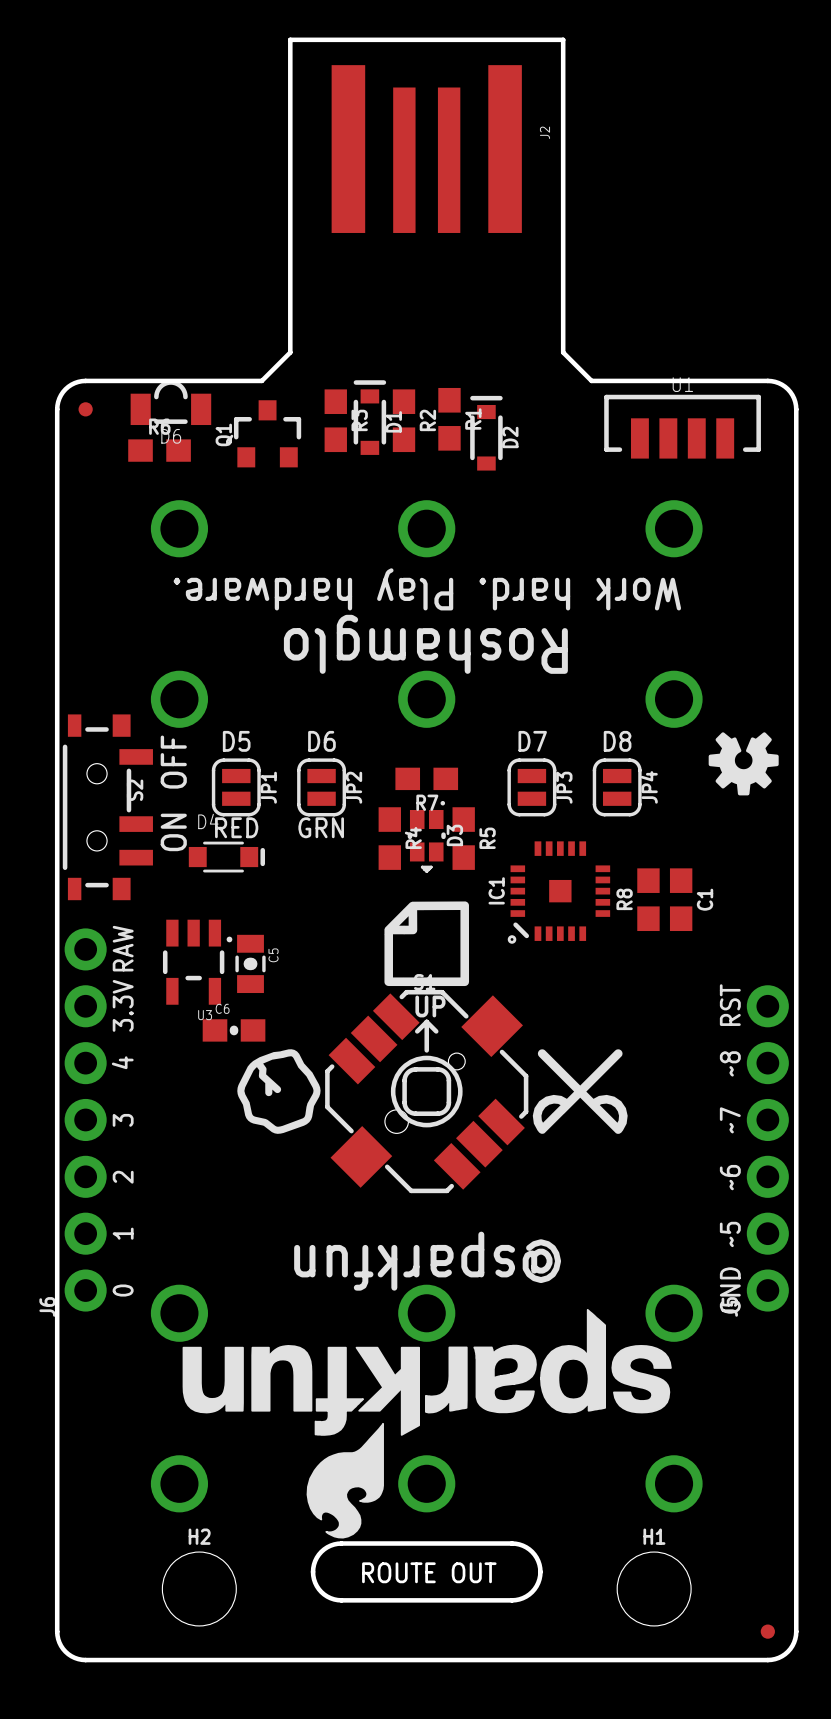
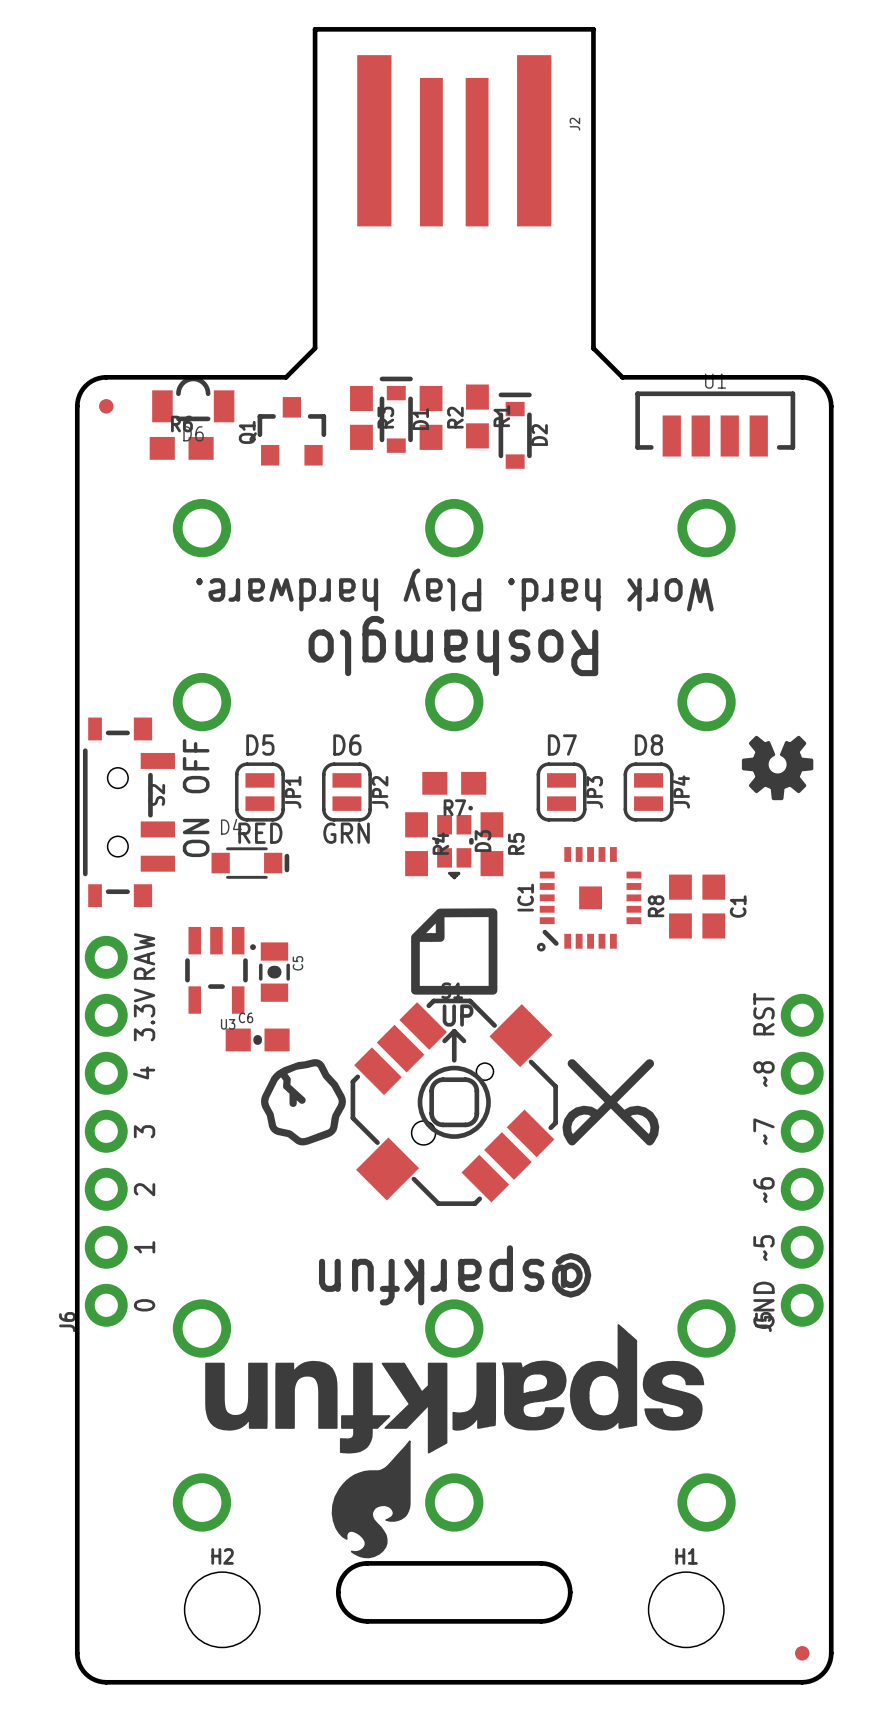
text: ROUTE OUT (429, 1572) -> none

